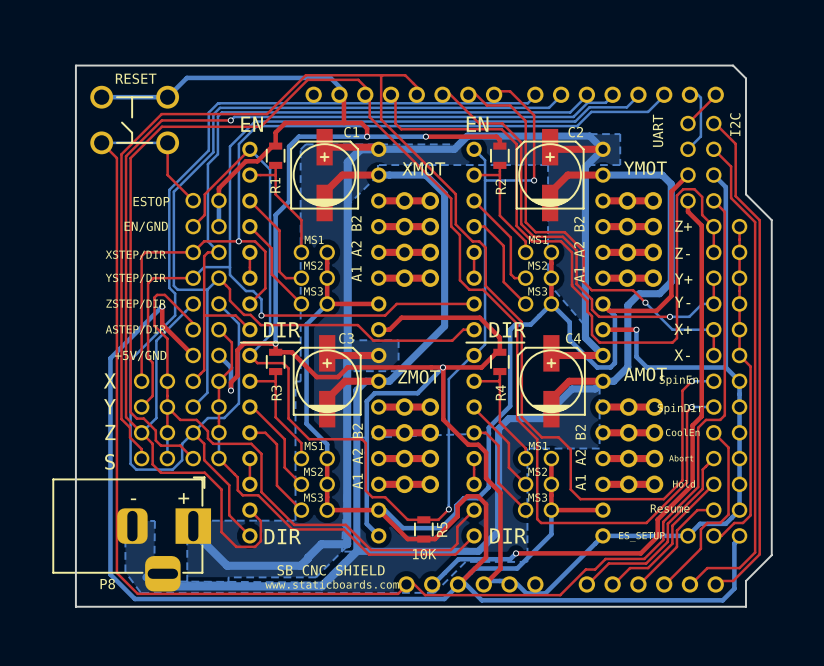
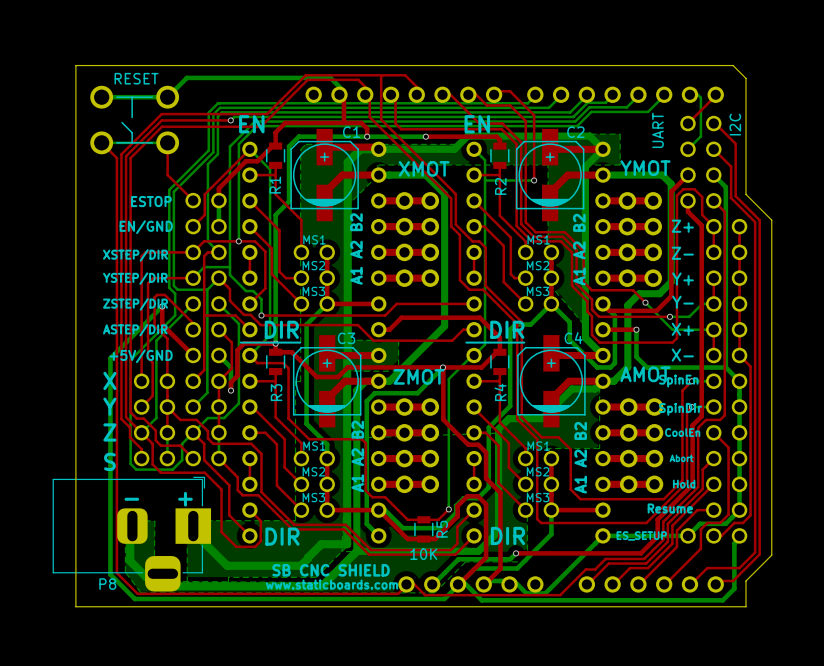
bottom track: none -> (130, 529) (130, 561) (146, 577)

